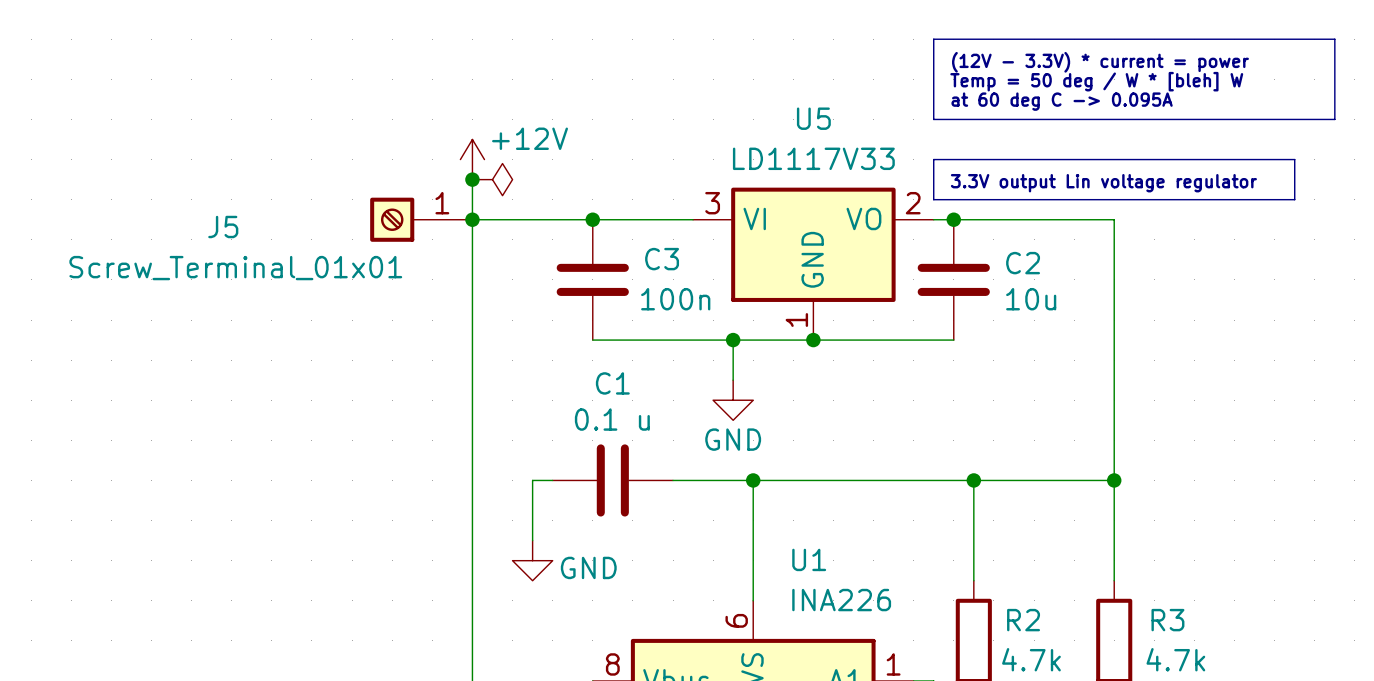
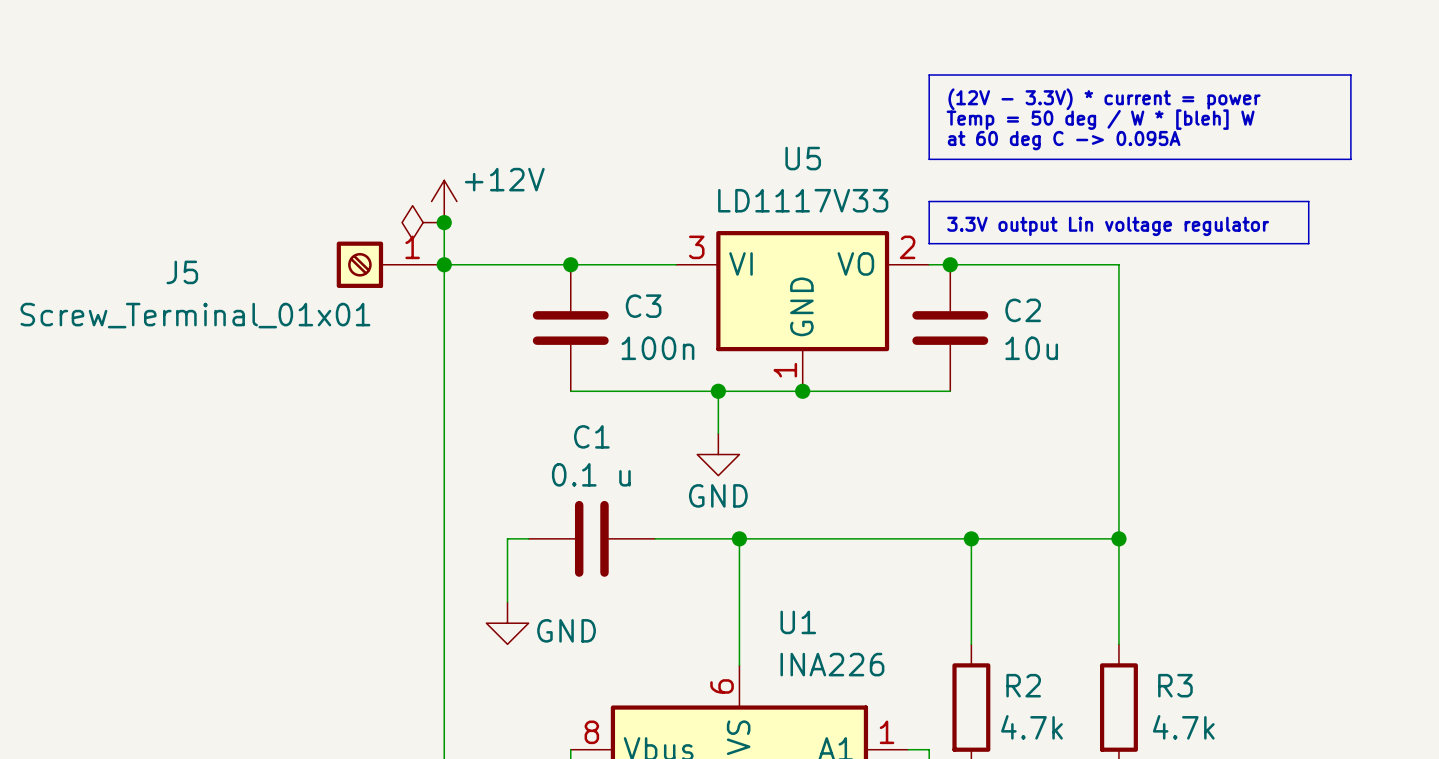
power symbol rotation: 0° (492, 179) -> 180° (423, 222)
power symbol position: (492, 179) -> (423, 222)

